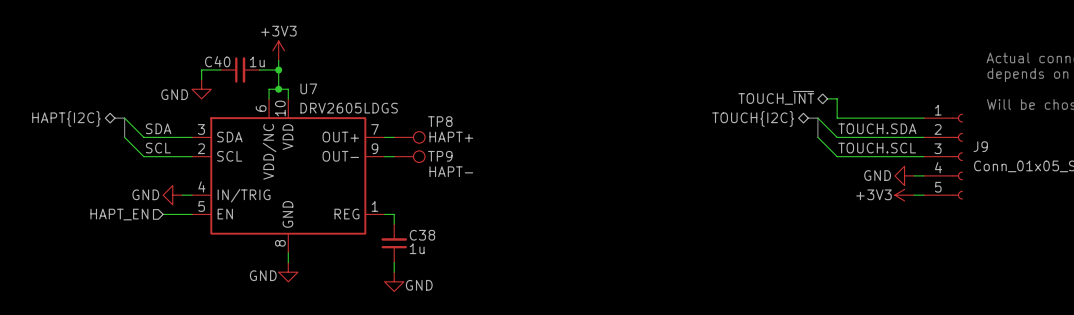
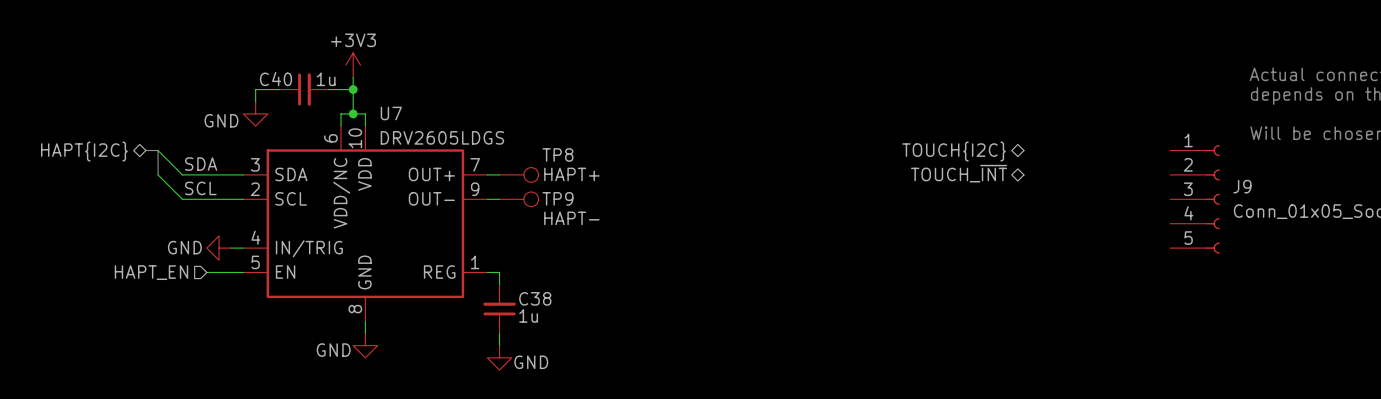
hierarchical label position: TOUCH_~{INT} (776, 97) -> TOUCH_~{INT} (959, 173)
wire: (827, 98) (837, 98) (837, 118) (923, 118) -> none
bus: (808, 118) (817, 118) (817, 137) -> none
wire: (817, 118) (837, 137) (923, 137) -> none
label: TOUCH.SDA (877, 128) -> none
wire: (817, 137) (837, 156) (923, 156) -> none
label: TOUCH.SCL (877, 148) -> none
power symbol: GND (904, 175) -> none
wire: (914, 175) (923, 175) -> none
power symbol: +3V3 (904, 195) -> none
wire: (914, 195) (923, 195) -> none

